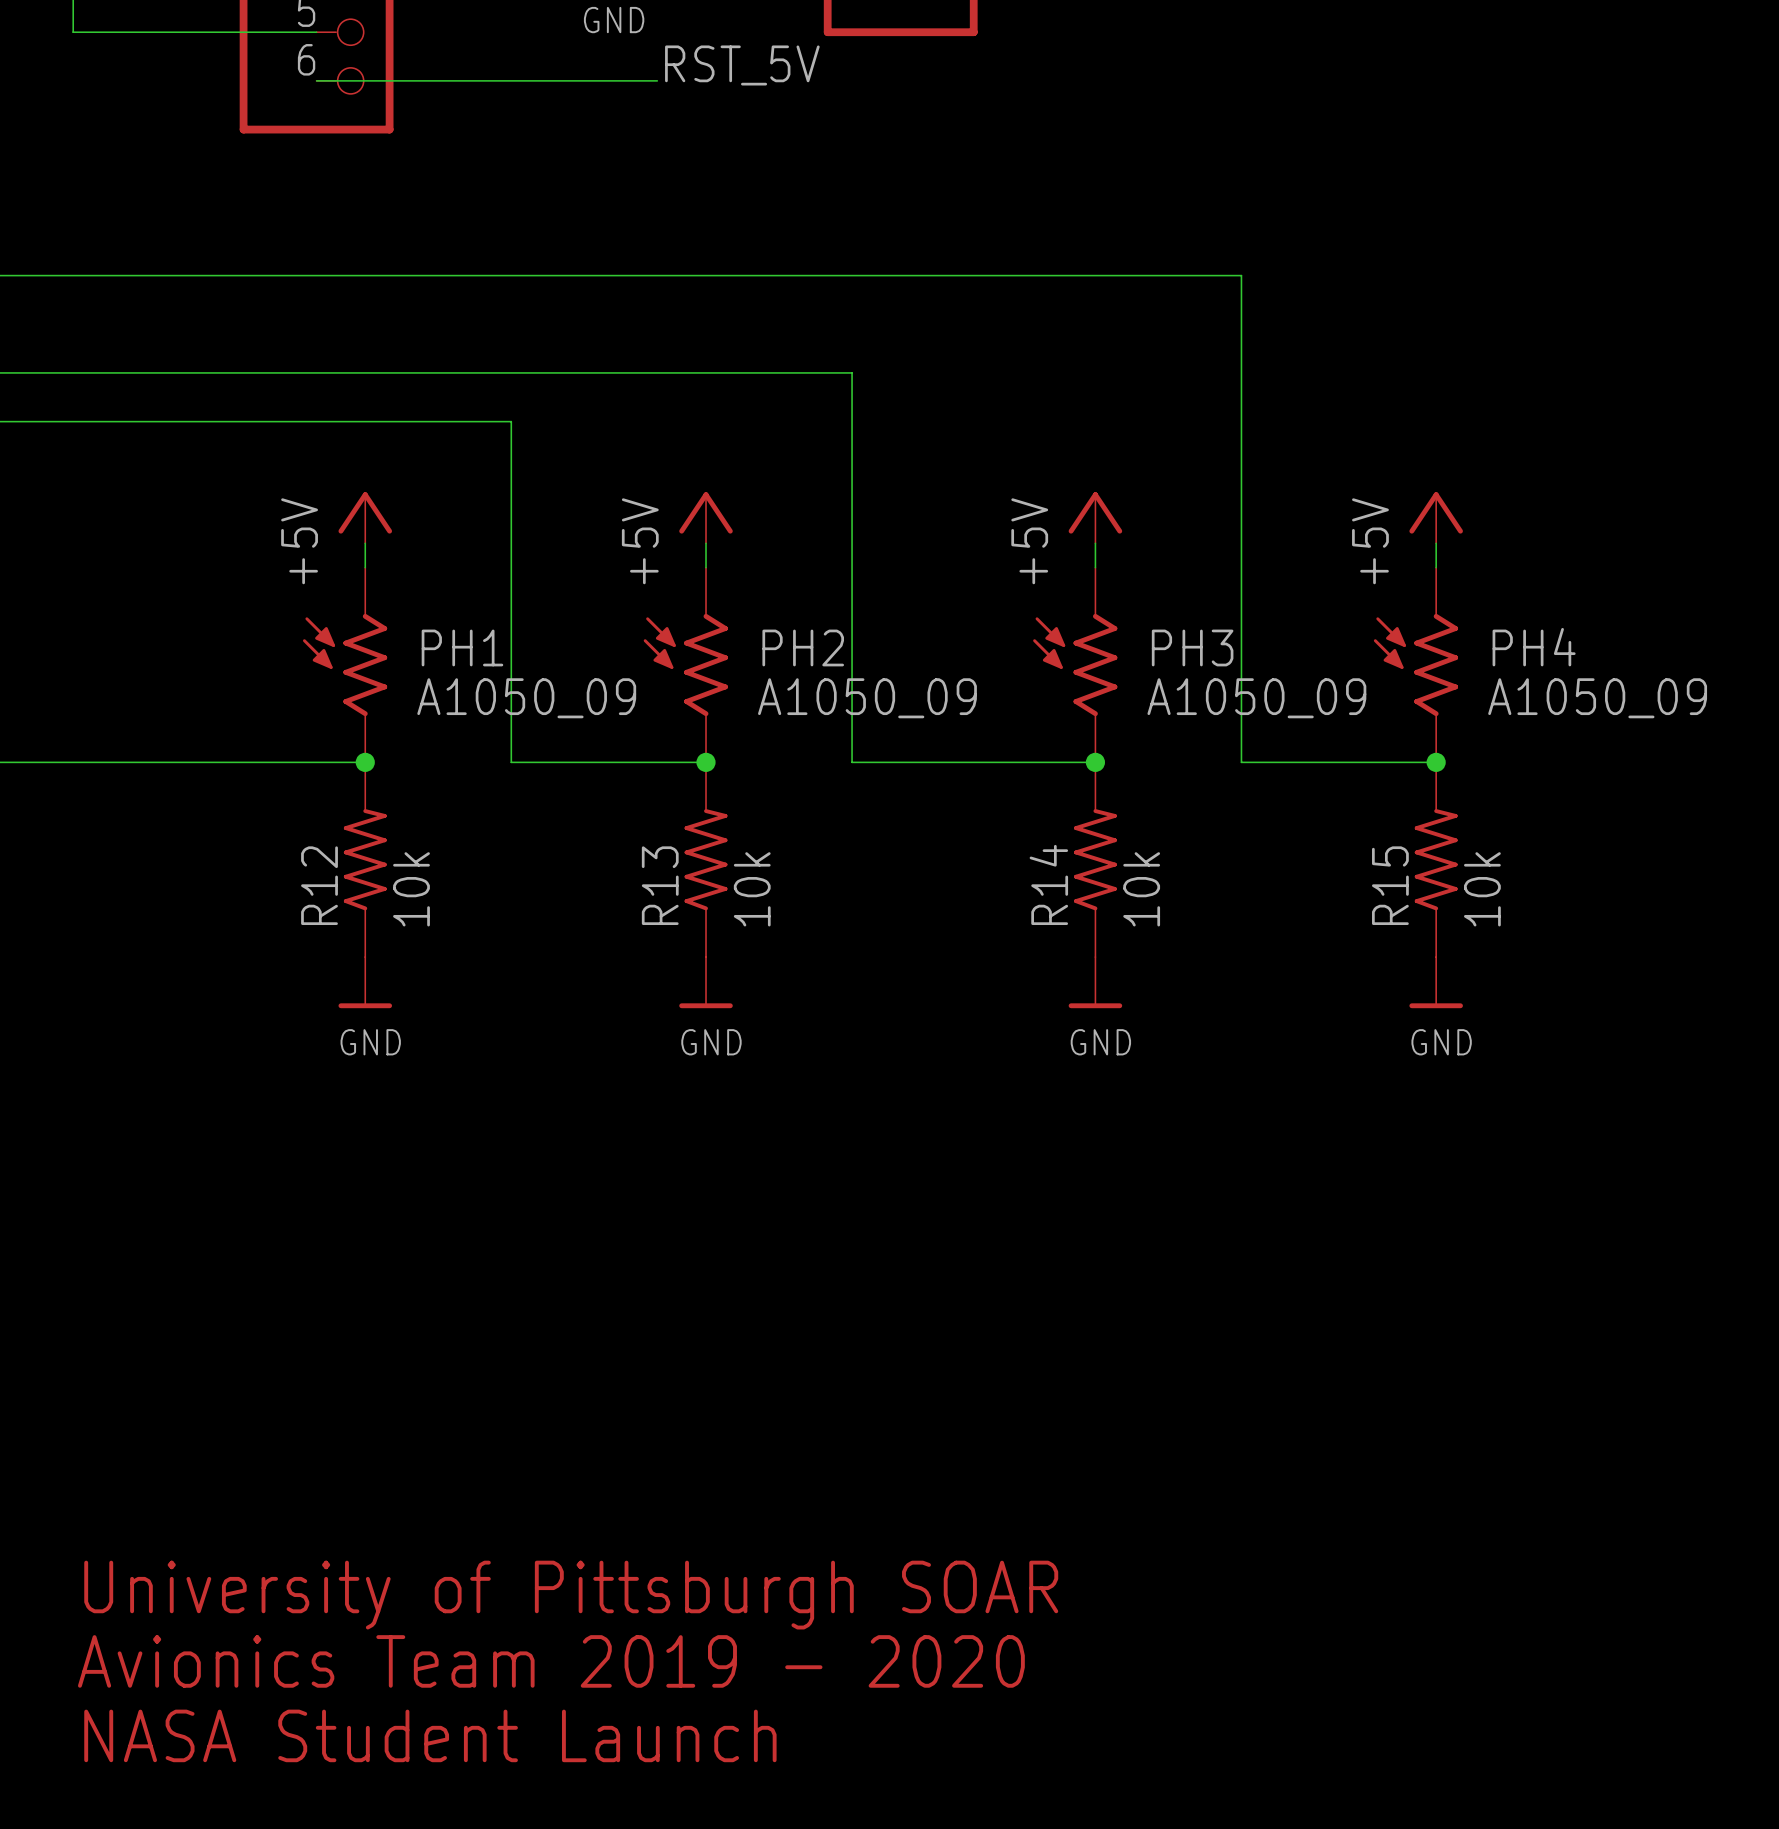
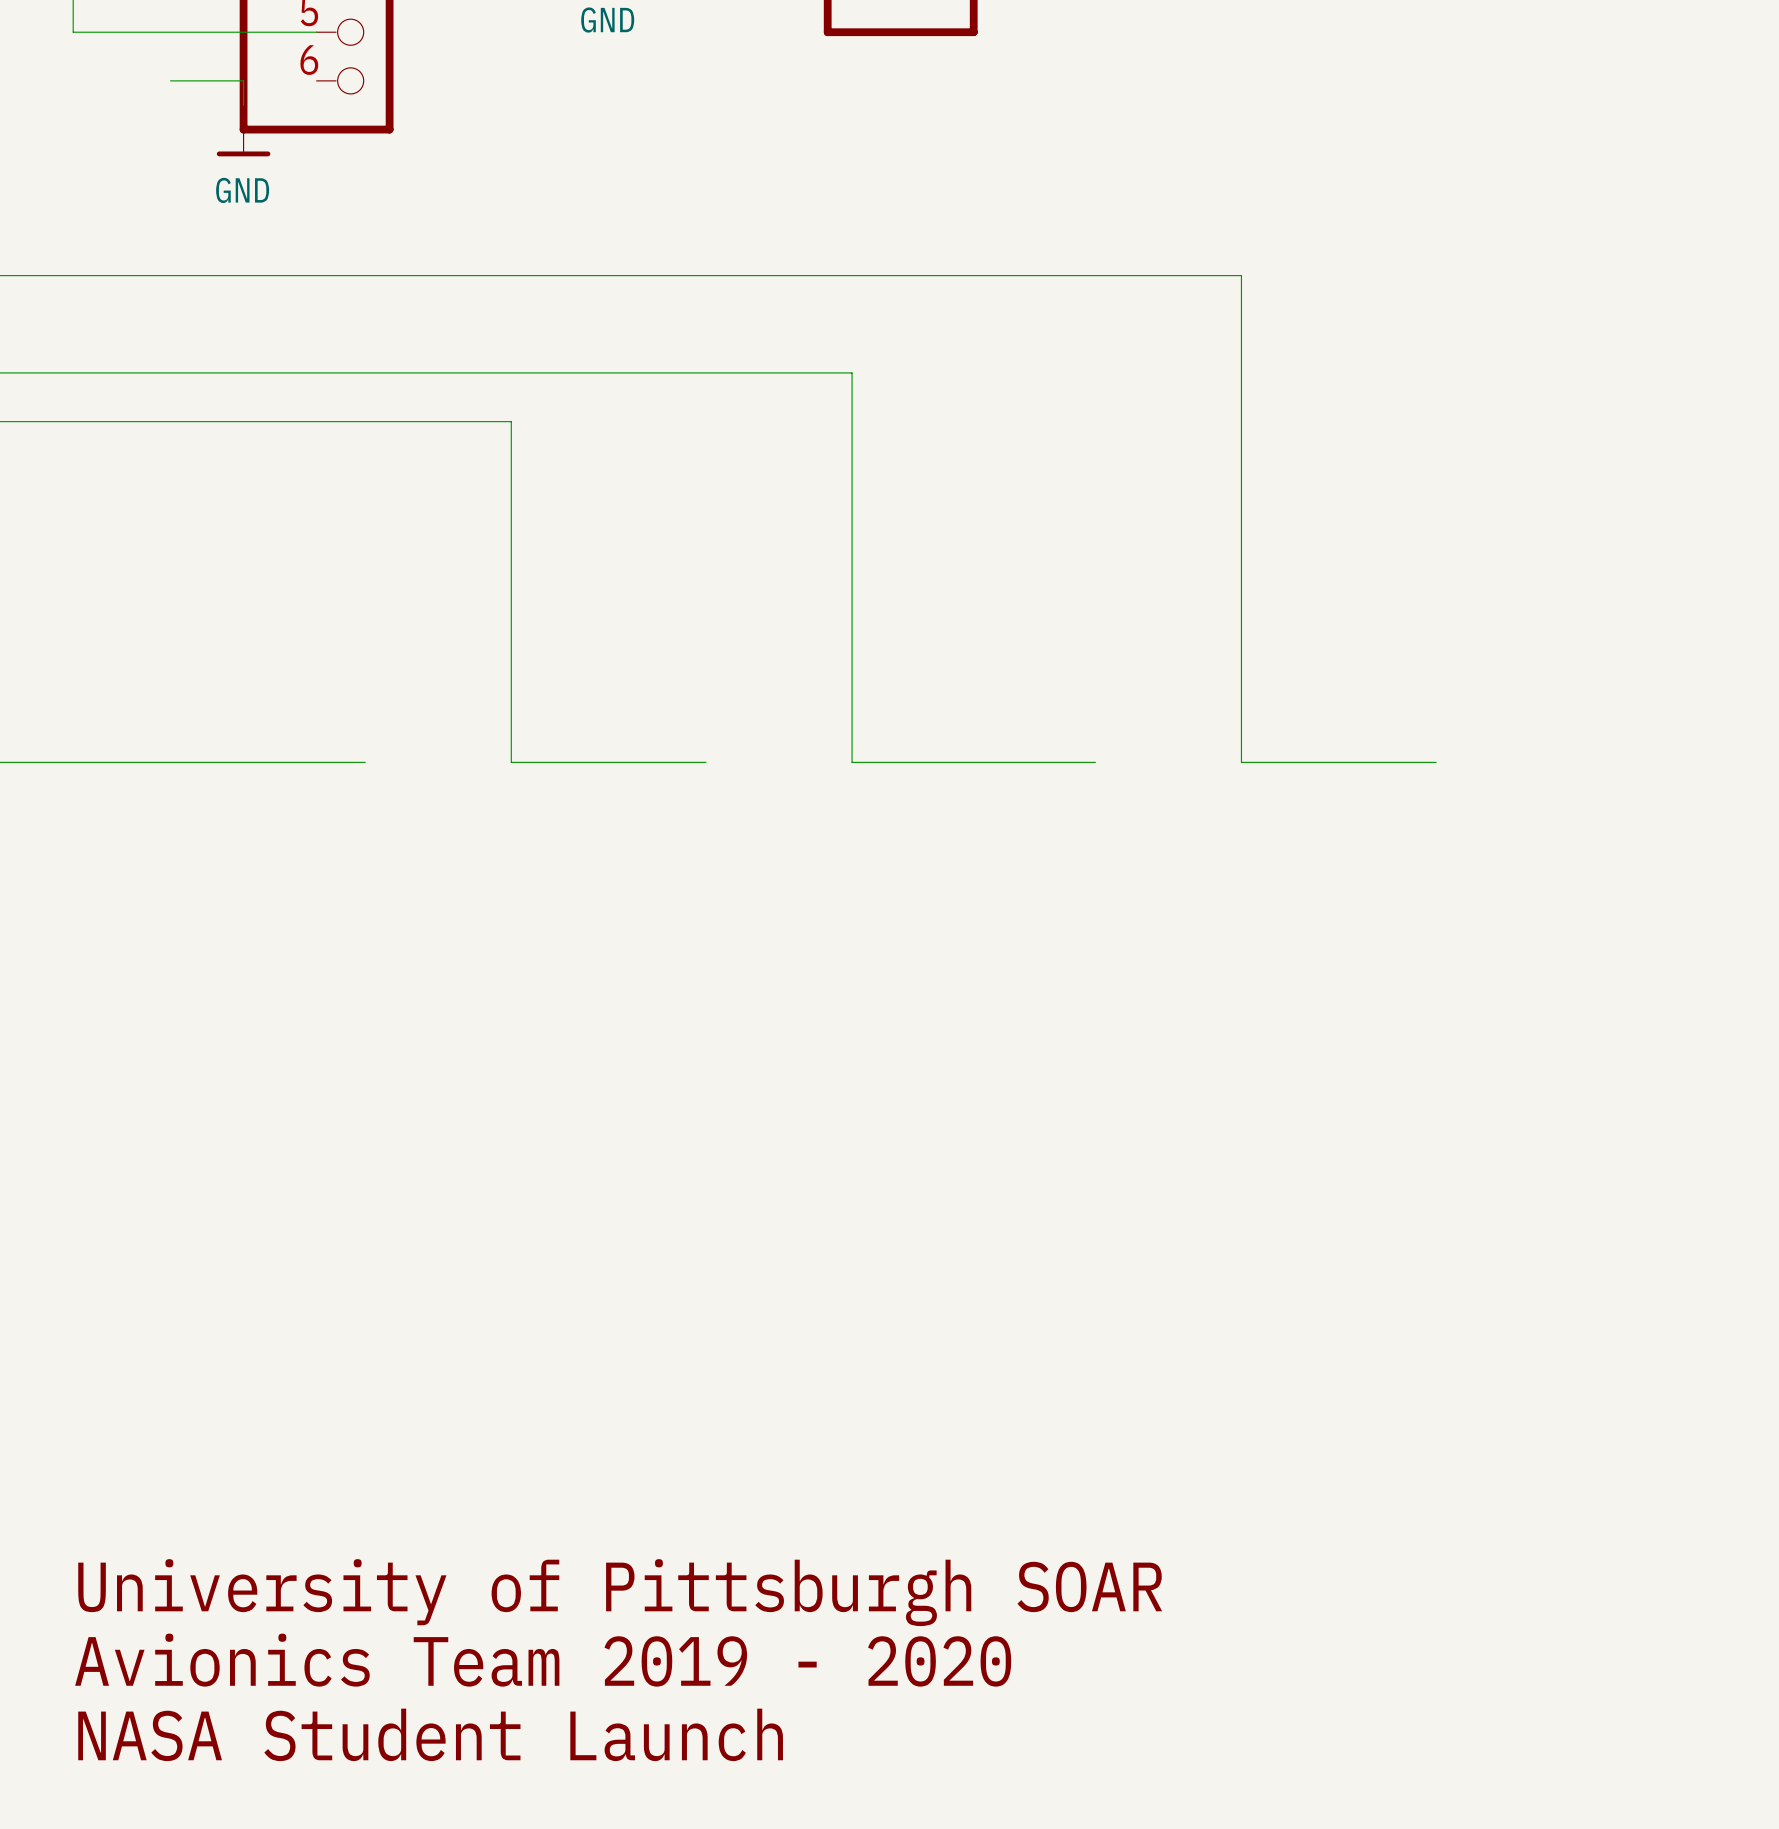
label: RST_5V (742, 65) -> none
wire: none -> (170, 80) (243, 80) (243, 105)
wire: (316, 80) (657, 80) -> none
power symbol: none -> GND (243, 130)
power symbol: +5V (365, 517) -> none
power symbol: +5V (706, 517) -> none
power symbol: +5V (1095, 517) -> none
power symbol: +5V (1436, 517) -> none
wire: (365, 543) (365, 567) -> none
wire: (706, 543) (706, 567) -> none
wire: (1095, 543) (1095, 567) -> none
wire: (1436, 543) (1436, 567) -> none
PH1: A1050_09 (345, 665) -> none
PH2: A1050_09 (685, 665) -> none
PH3: A1050_09 (1075, 665) -> none
PH4: A1050_09 (1415, 665) -> none
junction: (365, 762) -> none
junction: (706, 762) -> none
junction: (1095, 762) -> none
junction: (1436, 762) -> none
R12: 10k (365, 859) -> none
R13: 10k (706, 859) -> none
R14: 10k (1095, 859) -> none
R15: 10k (1436, 859) -> none
power symbol: GND (365, 982) -> none
power symbol: GND (706, 982) -> none
power symbol: GND (1095, 982) -> none
power symbol: GND (1436, 982) -> none

